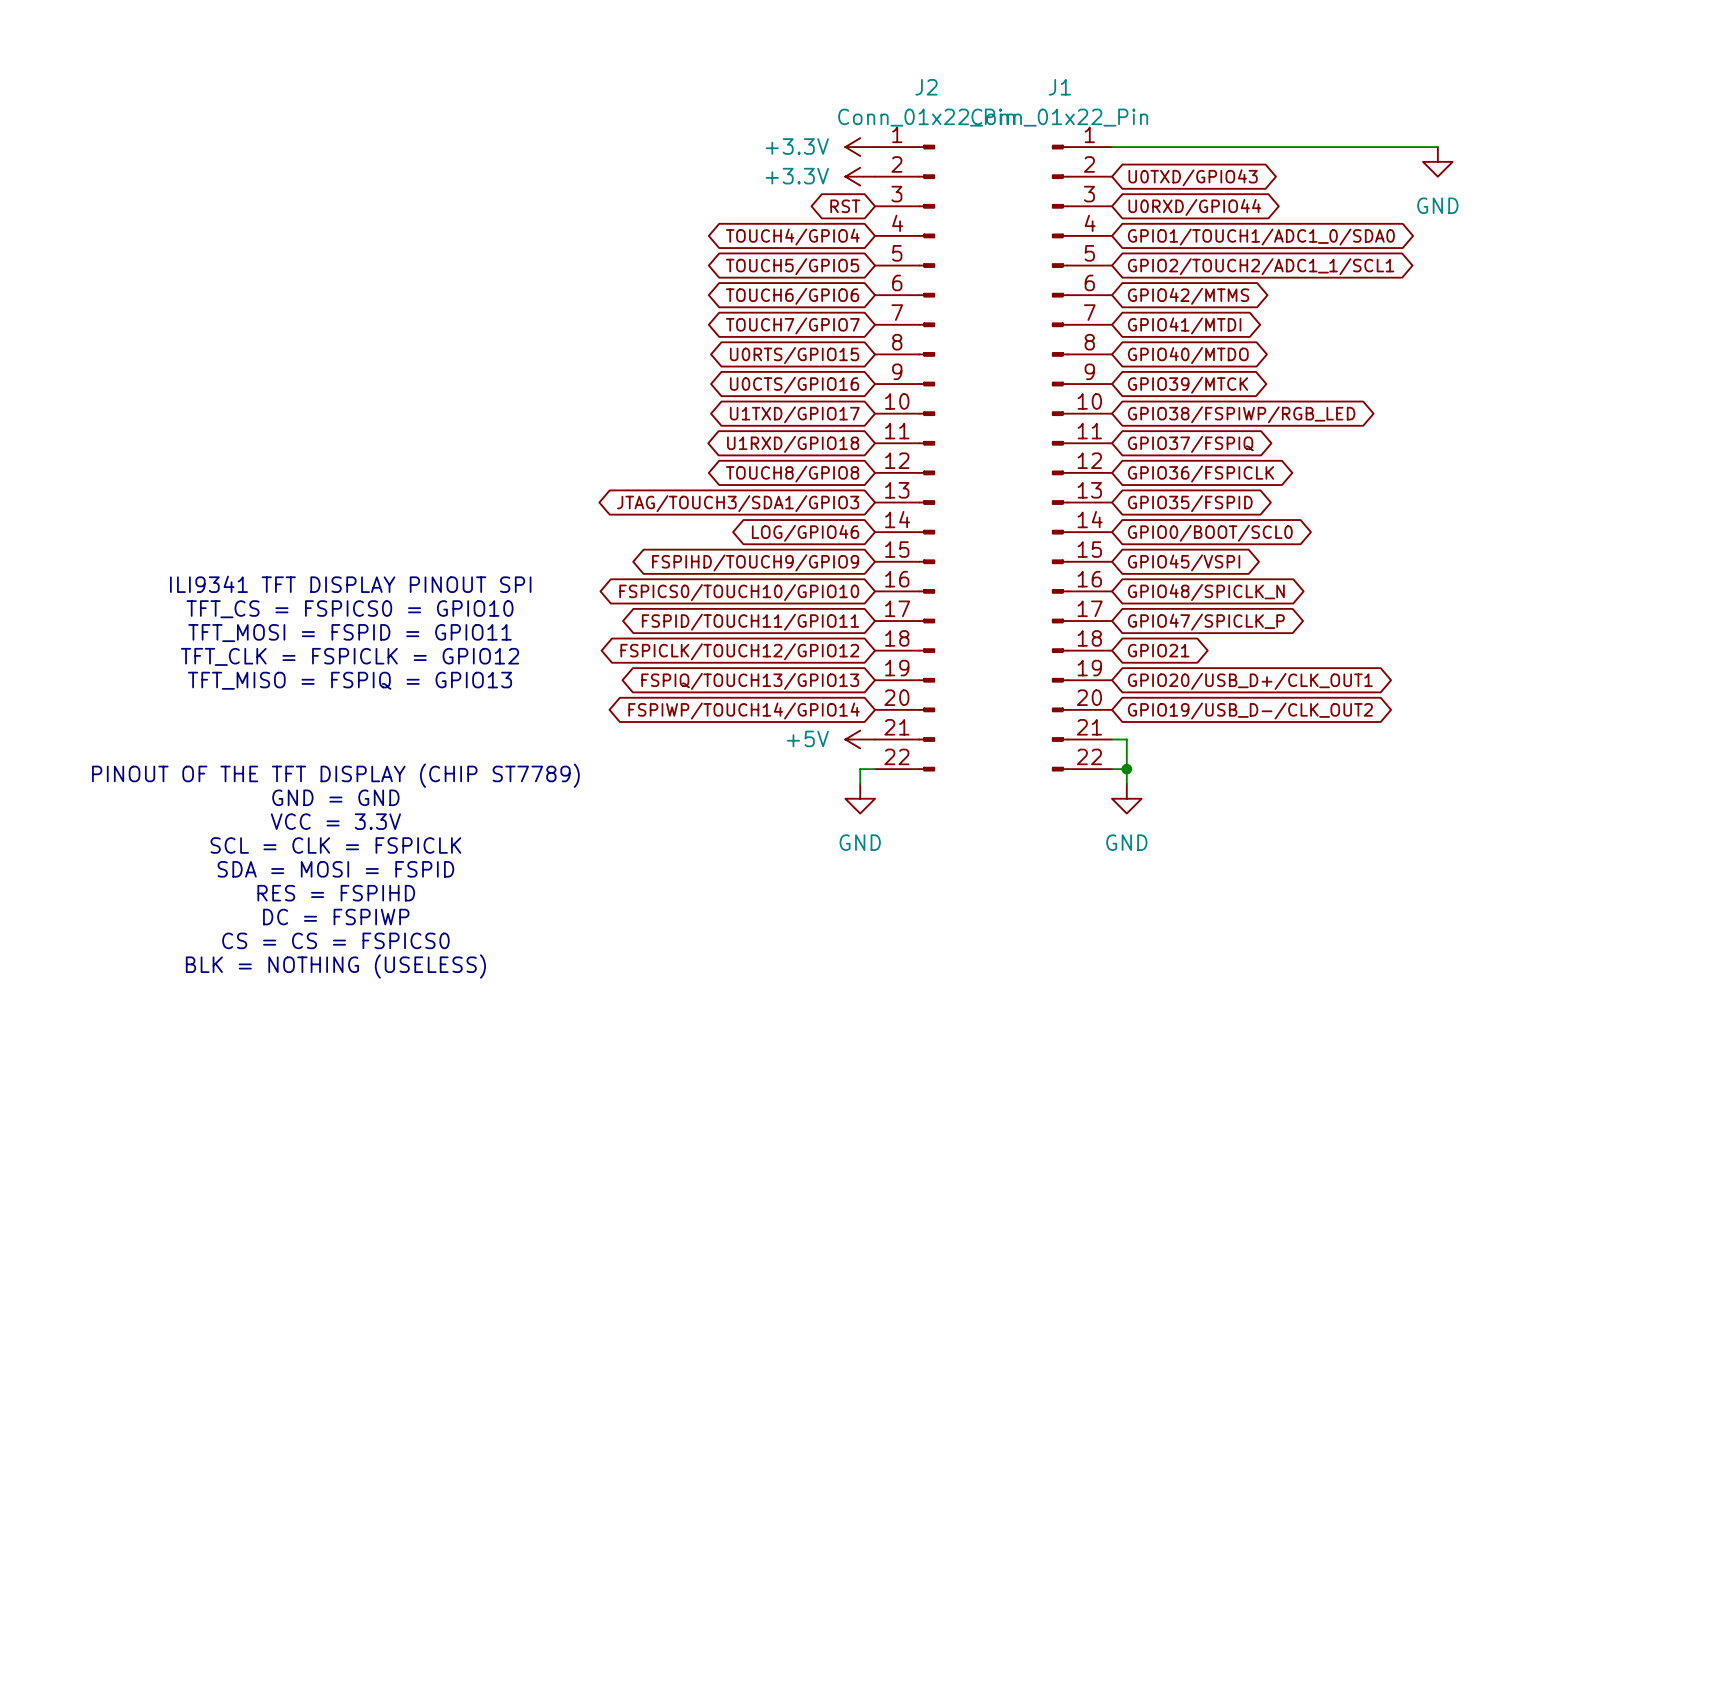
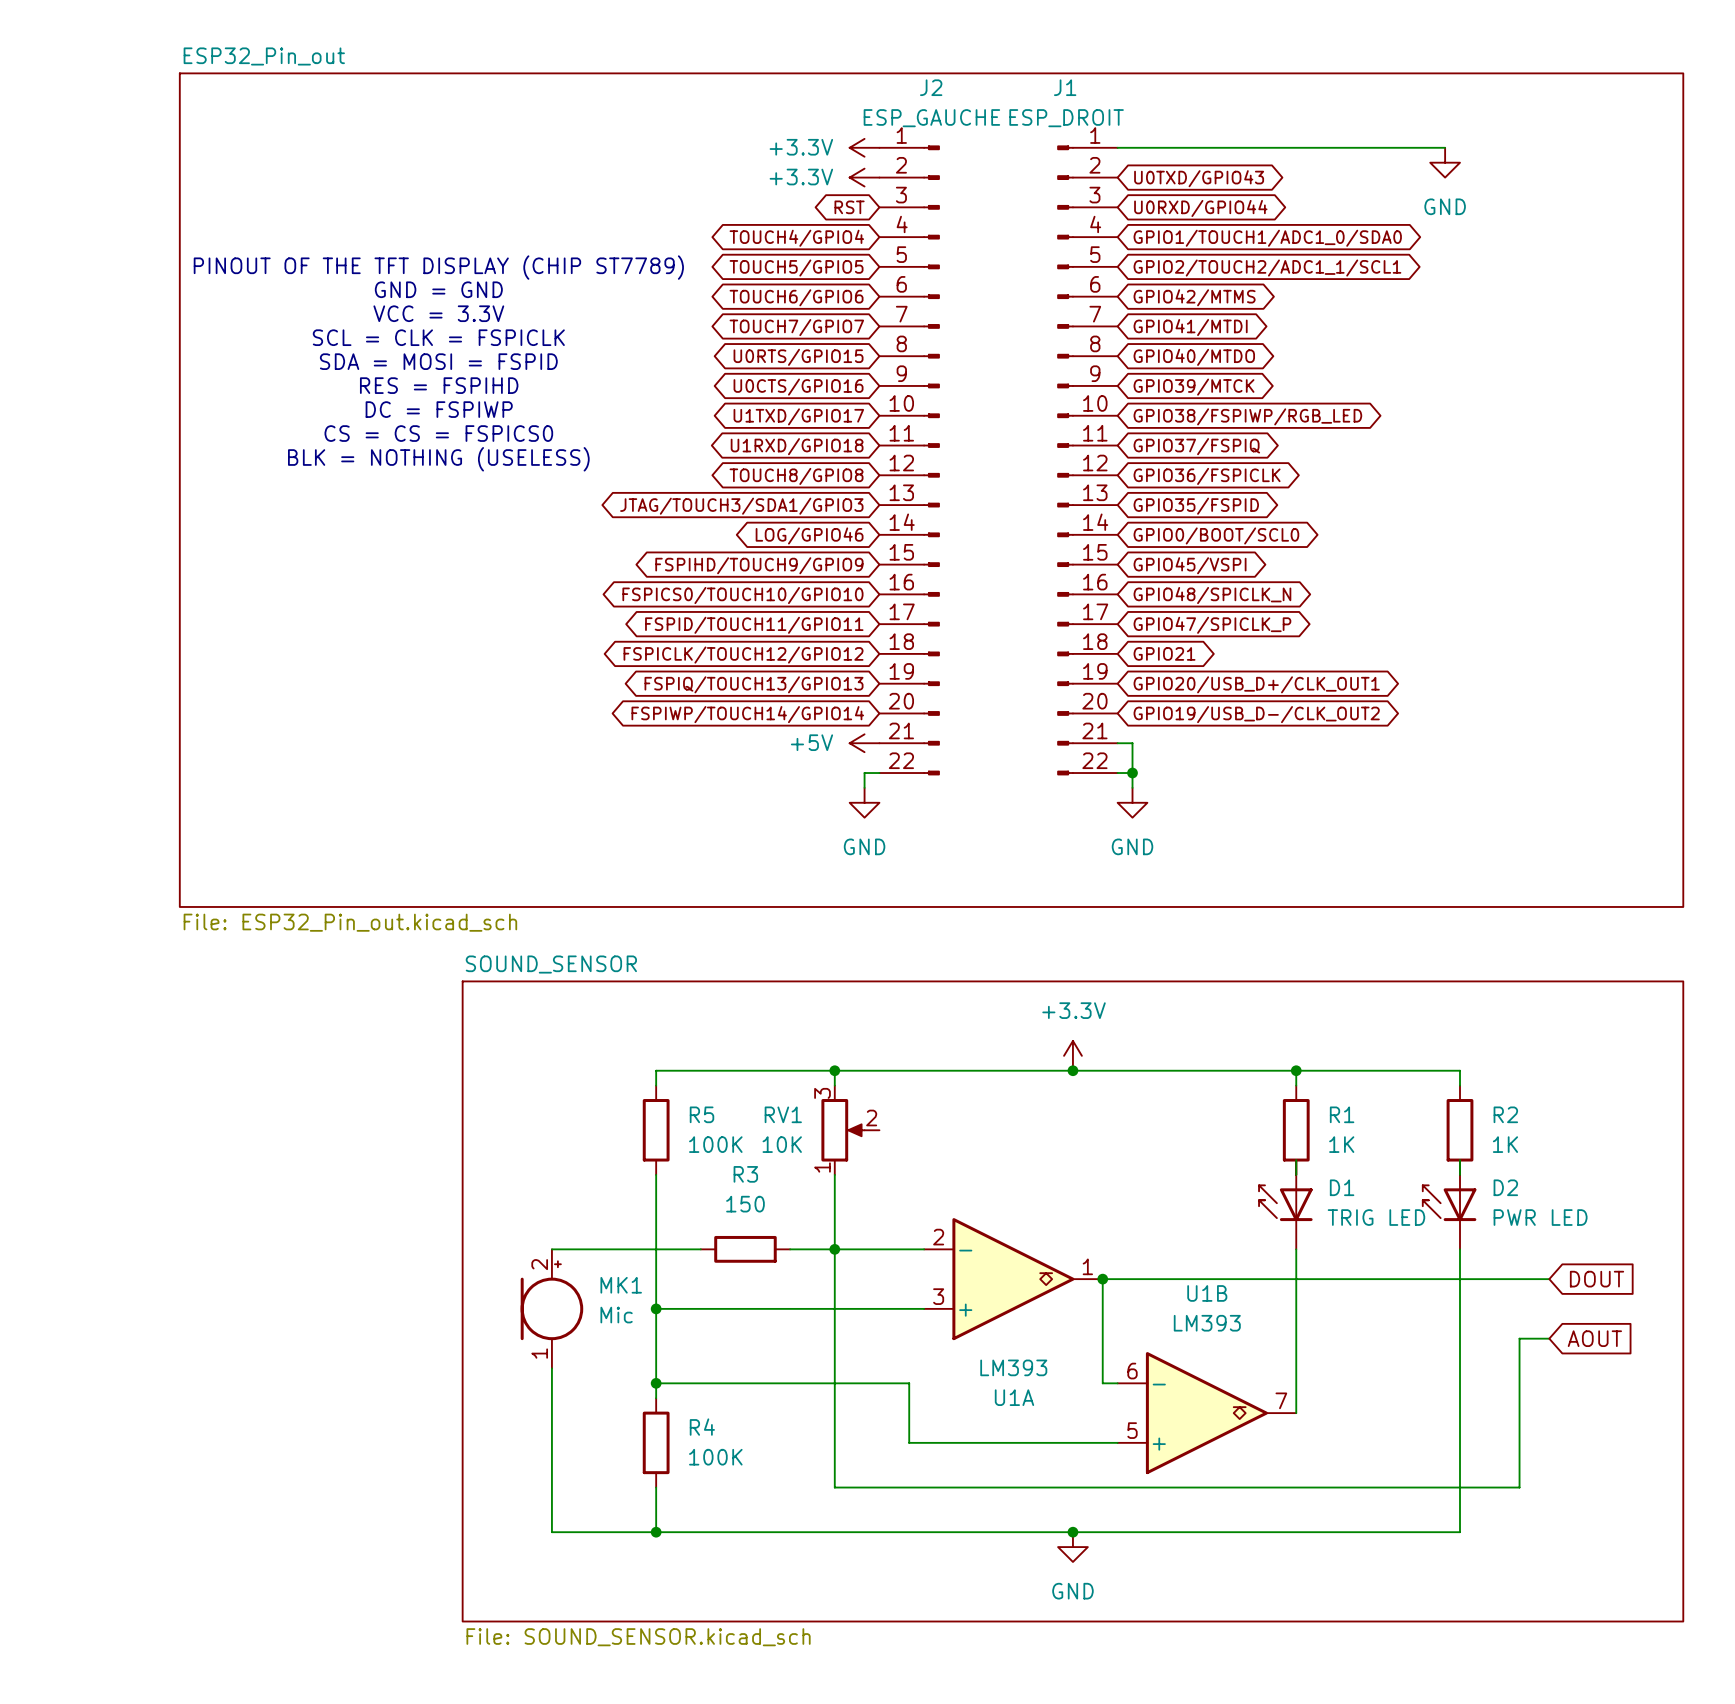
J2 value: Conn_01x22_Pin (926, 117) -> ESP_GAUCHE (931, 118)
J1 value: Conn_01x22_Pin (1059, 117) -> ESP_DROIT (1066, 118)
text: none -> PINOUT OF THE TFT DISPLAY (CHIP ST7789) (438, 267)
text: none -> GND = GND (438, 289)
text: none -> VCC = 3.3V (438, 313)
text: none -> SCL = CLK = FSPICLK (438, 337)
text: none -> SDA = MOSI = FSPID (438, 361)
text: none -> RES = FSPIHD (439, 385)
text: none -> DC = FSPIWP (439, 409)
text: none -> CS = CS = FSPICS0 (438, 433)
text: none -> BLK = NOTHING (USELESS) (438, 459)
sheet ESP32_Pin_out: none -> File: ESP32_Pin_out.kicad_sch (931, 490)
text: ILI9341 TFT DISPLAY PINOUT SPI (350, 584) -> none
text: TFT_CS = FSPICS0 = GPIO10 (350, 609) -> none
text: TFT_MOSI = FSPID = GPIO11 (350, 633) -> none
text: TFT_CLK = FSPICLK = GPIO12 (350, 656) -> none
text: TFT_MISO = FSPIQ = GPIO13 (350, 680) -> none
text: PINOUT OF THE TFT DISPLAY (CHIP ST7789) (335, 775) -> none
text: GND = GND (335, 797) -> none
text: VCC = 3.3V (335, 821) -> none
text: SCL = CLK = FSPICLK (335, 845) -> none
text: SDA = MOSI = FSPID (335, 869) -> none
text: RES = FSPIHD (336, 893) -> none
text: DC = FSPIWP (336, 917) -> none
text: CS = CS = FSPICS0 (335, 940) -> none
text: BLK = NOTHING (USELESS) (335, 966) -> none
power symbol: none -> +3.3V (1072, 1055)
wire: none -> (834, 1070) (834, 1085)
junction: none -> (834, 1070)
junction: none -> (1072, 1070)
wire: none -> (1296, 1070) (1296, 1085)
junction: none -> (1296, 1070)
wire: none -> (656, 1085) (656, 1070) (1459, 1070) (1459, 1085)
R5: none -> 100K (656, 1130)
RV1: none -> 10K (850, 1130)
R1: none -> 1K (1296, 1130)
R2: none -> 1K (1459, 1130)
wire: none -> (1296, 1160) (1296, 1174)
wire: none -> (1459, 1160) (1459, 1174)
wire: none -> (656, 1174) (656, 1398)
wire: none -> (834, 1174) (834, 1487) (1519, 1487) (1519, 1338) (1549, 1338)
D1: none -> TRIG LED (1285, 1204)
D2: none -> PWR LED (1449, 1204)
wire: none -> (551, 1249) (700, 1249)
R3: none -> 150 (745, 1249)
wire: none -> (790, 1249) (924, 1249)
junction: none -> (834, 1249)
wire: none -> (1296, 1249) (1296, 1413)
wire: none -> (1459, 1249) (1459, 1532) (551, 1532) (551, 1368)
U1A: none -> LM393 (1013, 1279)
junction: none -> (1102, 1279)
wire: none -> (1549, 1279) (1102, 1279) (1102, 1383) (1117, 1383)
global label: none -> DOUT (1597, 1279)
sheet SOUND_SENSOR: none -> File: SOUND_SENSOR.kicad_sch (1072, 1301)
MK1: none -> Mic (551, 1308)
wire: none -> (656, 1308) (924, 1308)
junction: none -> (656, 1308)
global label: none -> AOUT (1594, 1338)
wire: none -> (656, 1383) (909, 1383) (909, 1442) (1117, 1442)
junction: none -> (656, 1383)
U1B: none -> LM393 (1206, 1413)
R4: none -> 100K (656, 1442)
wire: none -> (656, 1487) (656, 1532)
junction: none -> (656, 1532)
junction: none -> (1072, 1532)
power symbol: none -> GND (1072, 1547)

